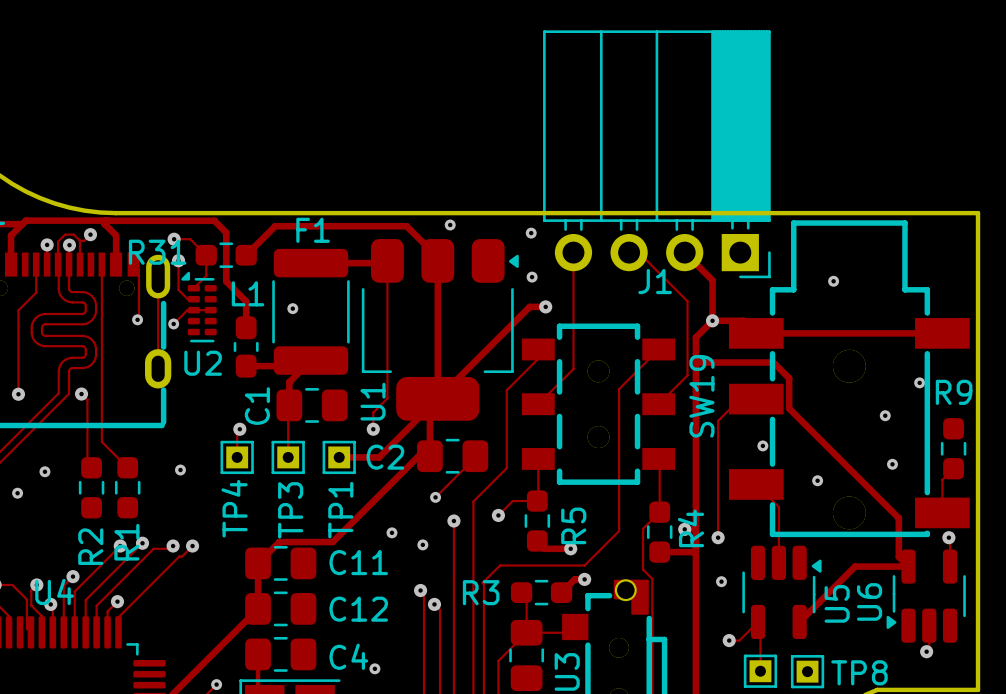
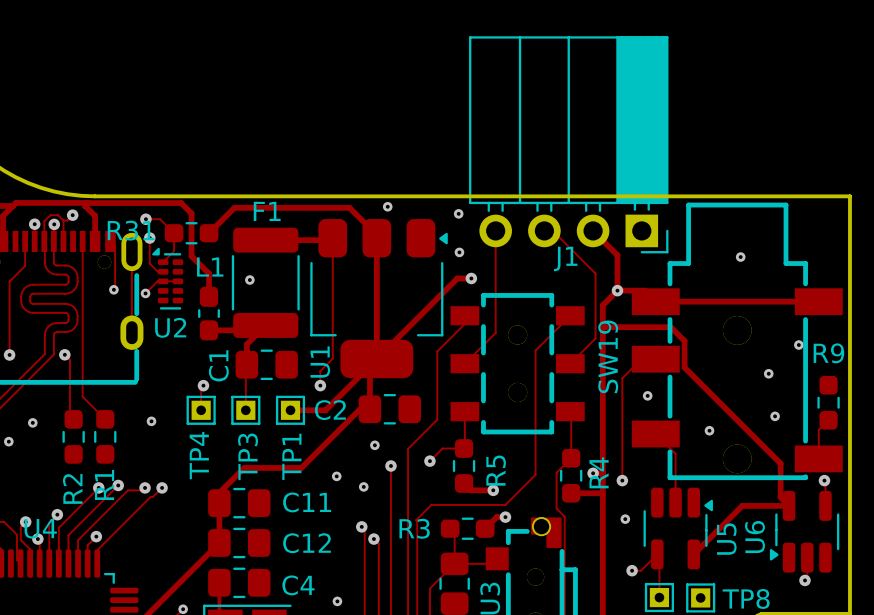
via position: (833, 281) -> (740, 257)
via position: (762, 445) -> (647, 395)
track: (475, 457) (435, 497) -> none
track: (351, 523) (332, 542) (279, 542) (258, 563) -> (301, 467) (244, 467) (219, 492) (219, 503)
via position: (374, 668) -> (337, 601)

